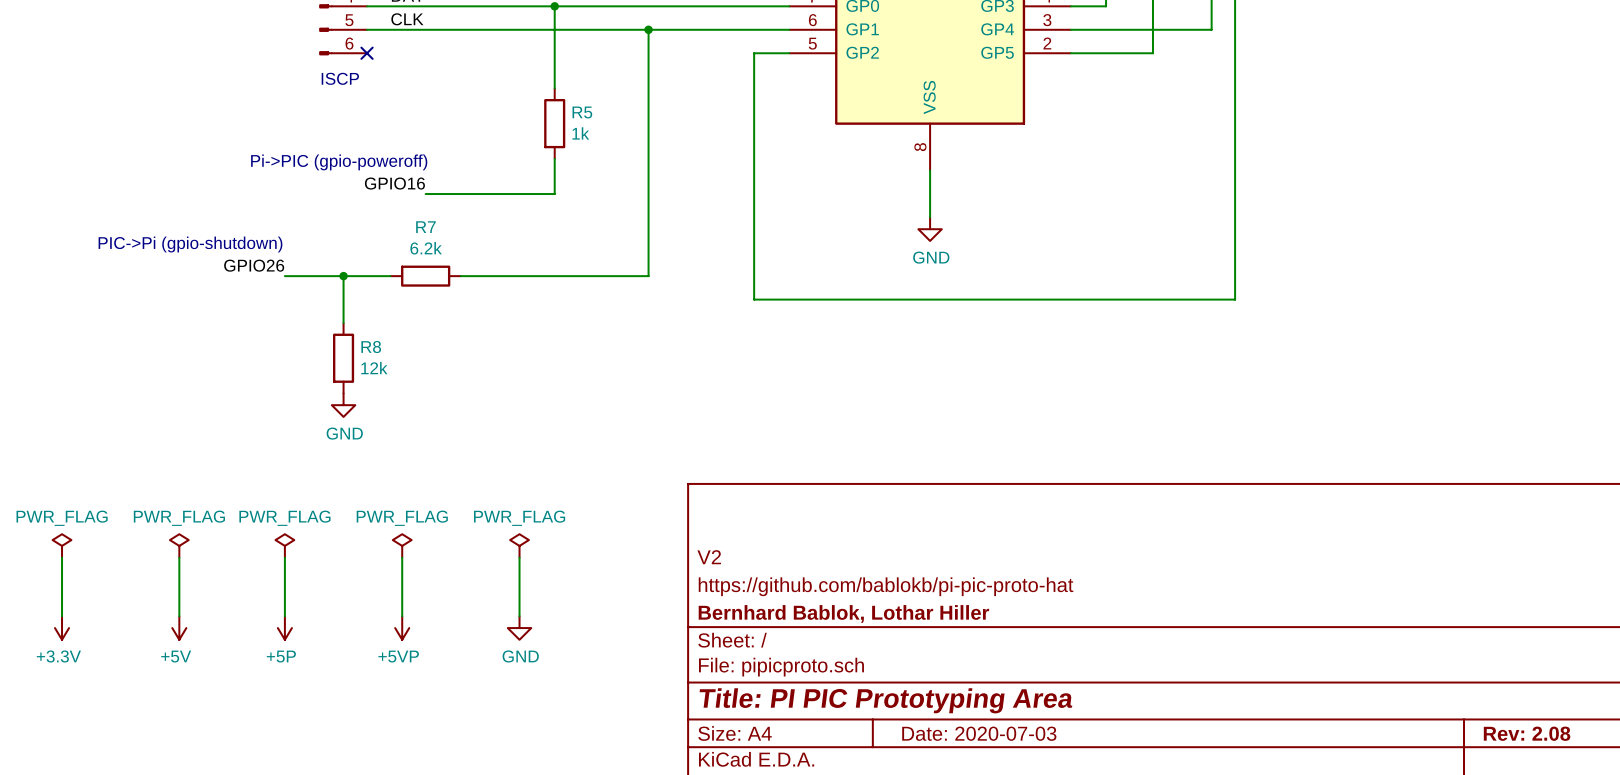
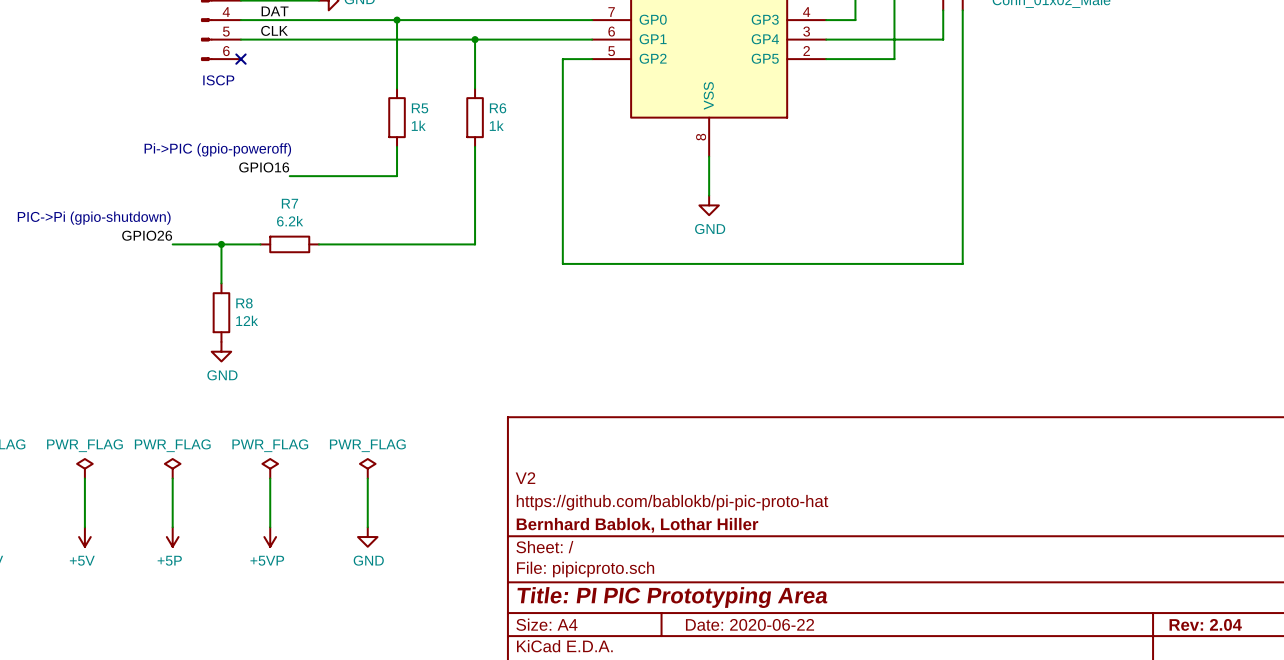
wire: (648, 88) (648, 158) -> none
R6: none -> 1k (475, 117)
title block: Date: 2020-07-03 (979, 733) -> Date: 2020-06-22 (750, 624)
title block: Rev: 2.08 (1527, 733) -> Rev: 2.04 (1205, 624)

